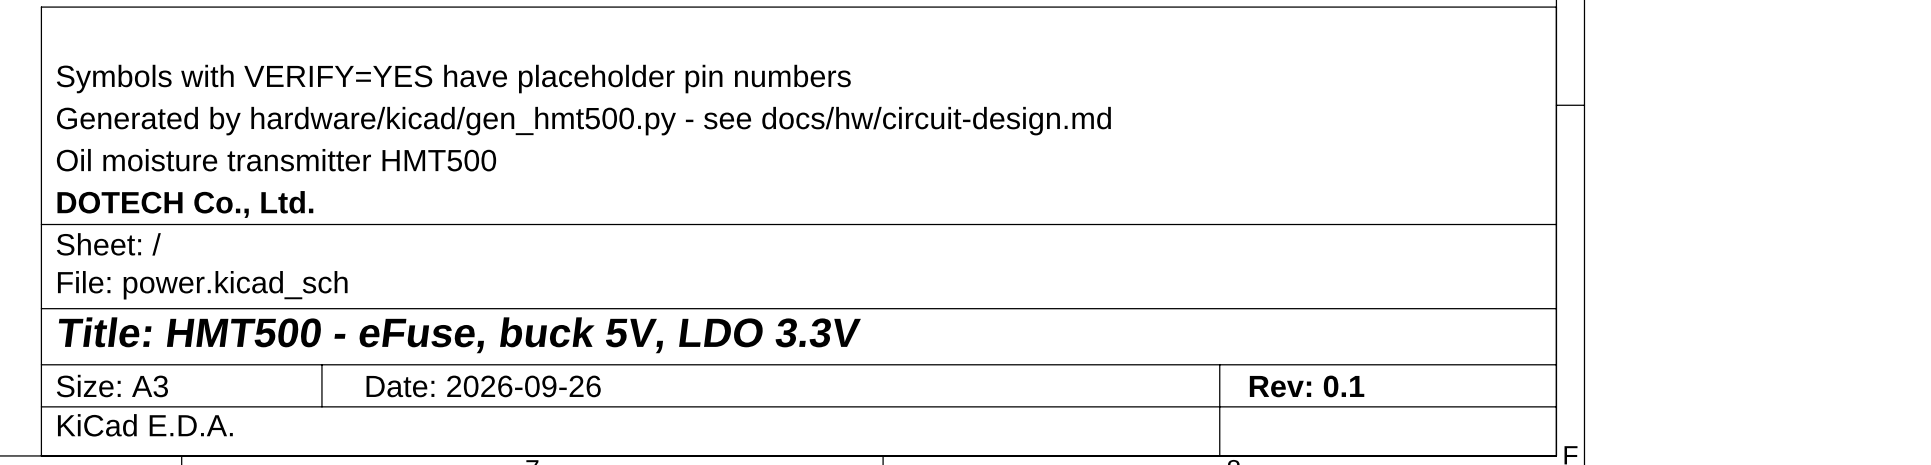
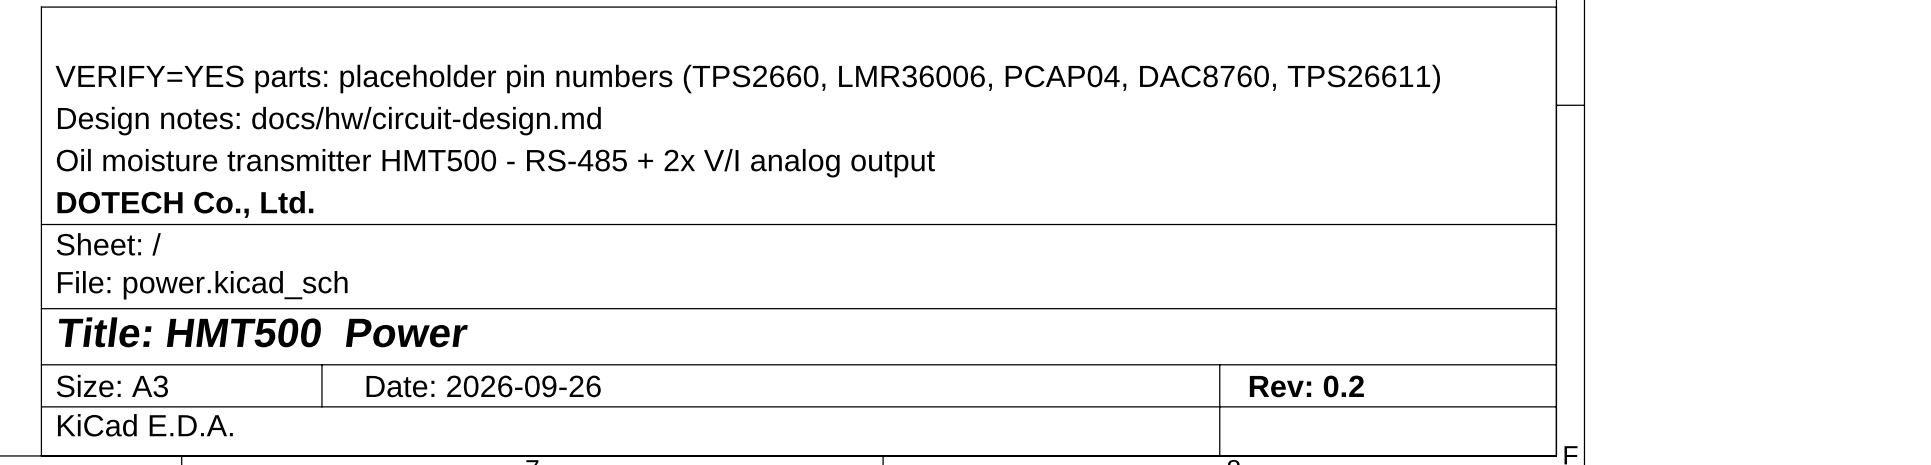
title block: Symbols with VERIFY=YES have placeholder pin numbers (453, 79) -> VERIFY=YES parts: placeholder pin numbers (TPS2660, LMR36006, PCAP04, DAC8760, TPS26611) (747, 79)
title block: Generated by hardware/kicad/gen_hmt500.py - see docs/hw/circuit-design.md (583, 121) -> Design notes: docs/hw/circuit-design.md (329, 121)
title block: Oil moisture transmitter HMT500 (276, 160) -> Oil moisture transmitter HMT500 - RS-485 + 2x V/I analog output (495, 163)
title block: Title: HMT500 - eFuse, buck 5V, LDO 3.3V (459, 335) -> Title: HMT500 Power (263, 332)
title block: Rev: 0.1 (1307, 386) -> Rev: 0.2 (1306, 386)

